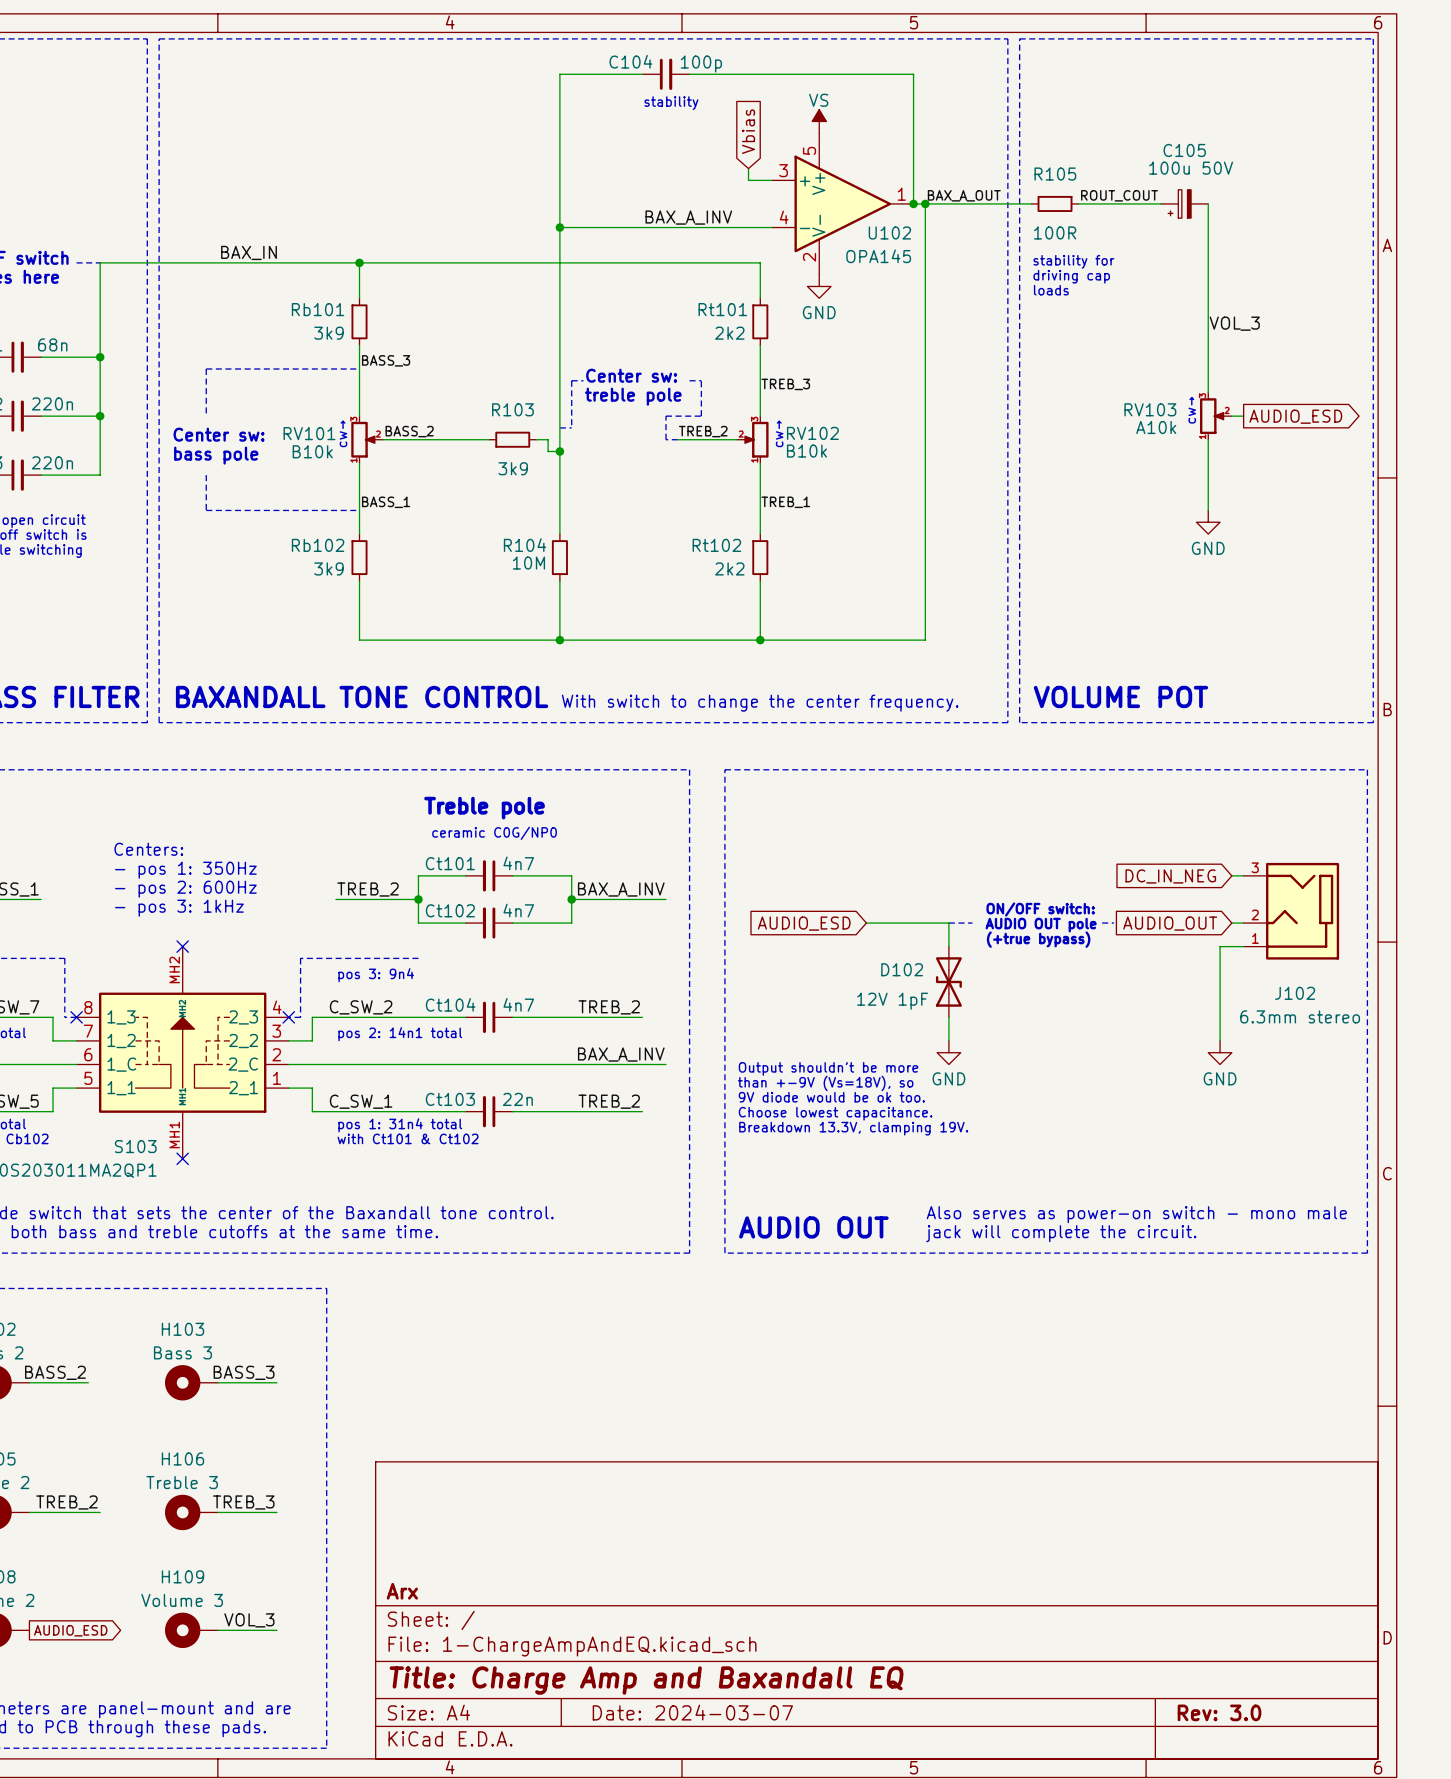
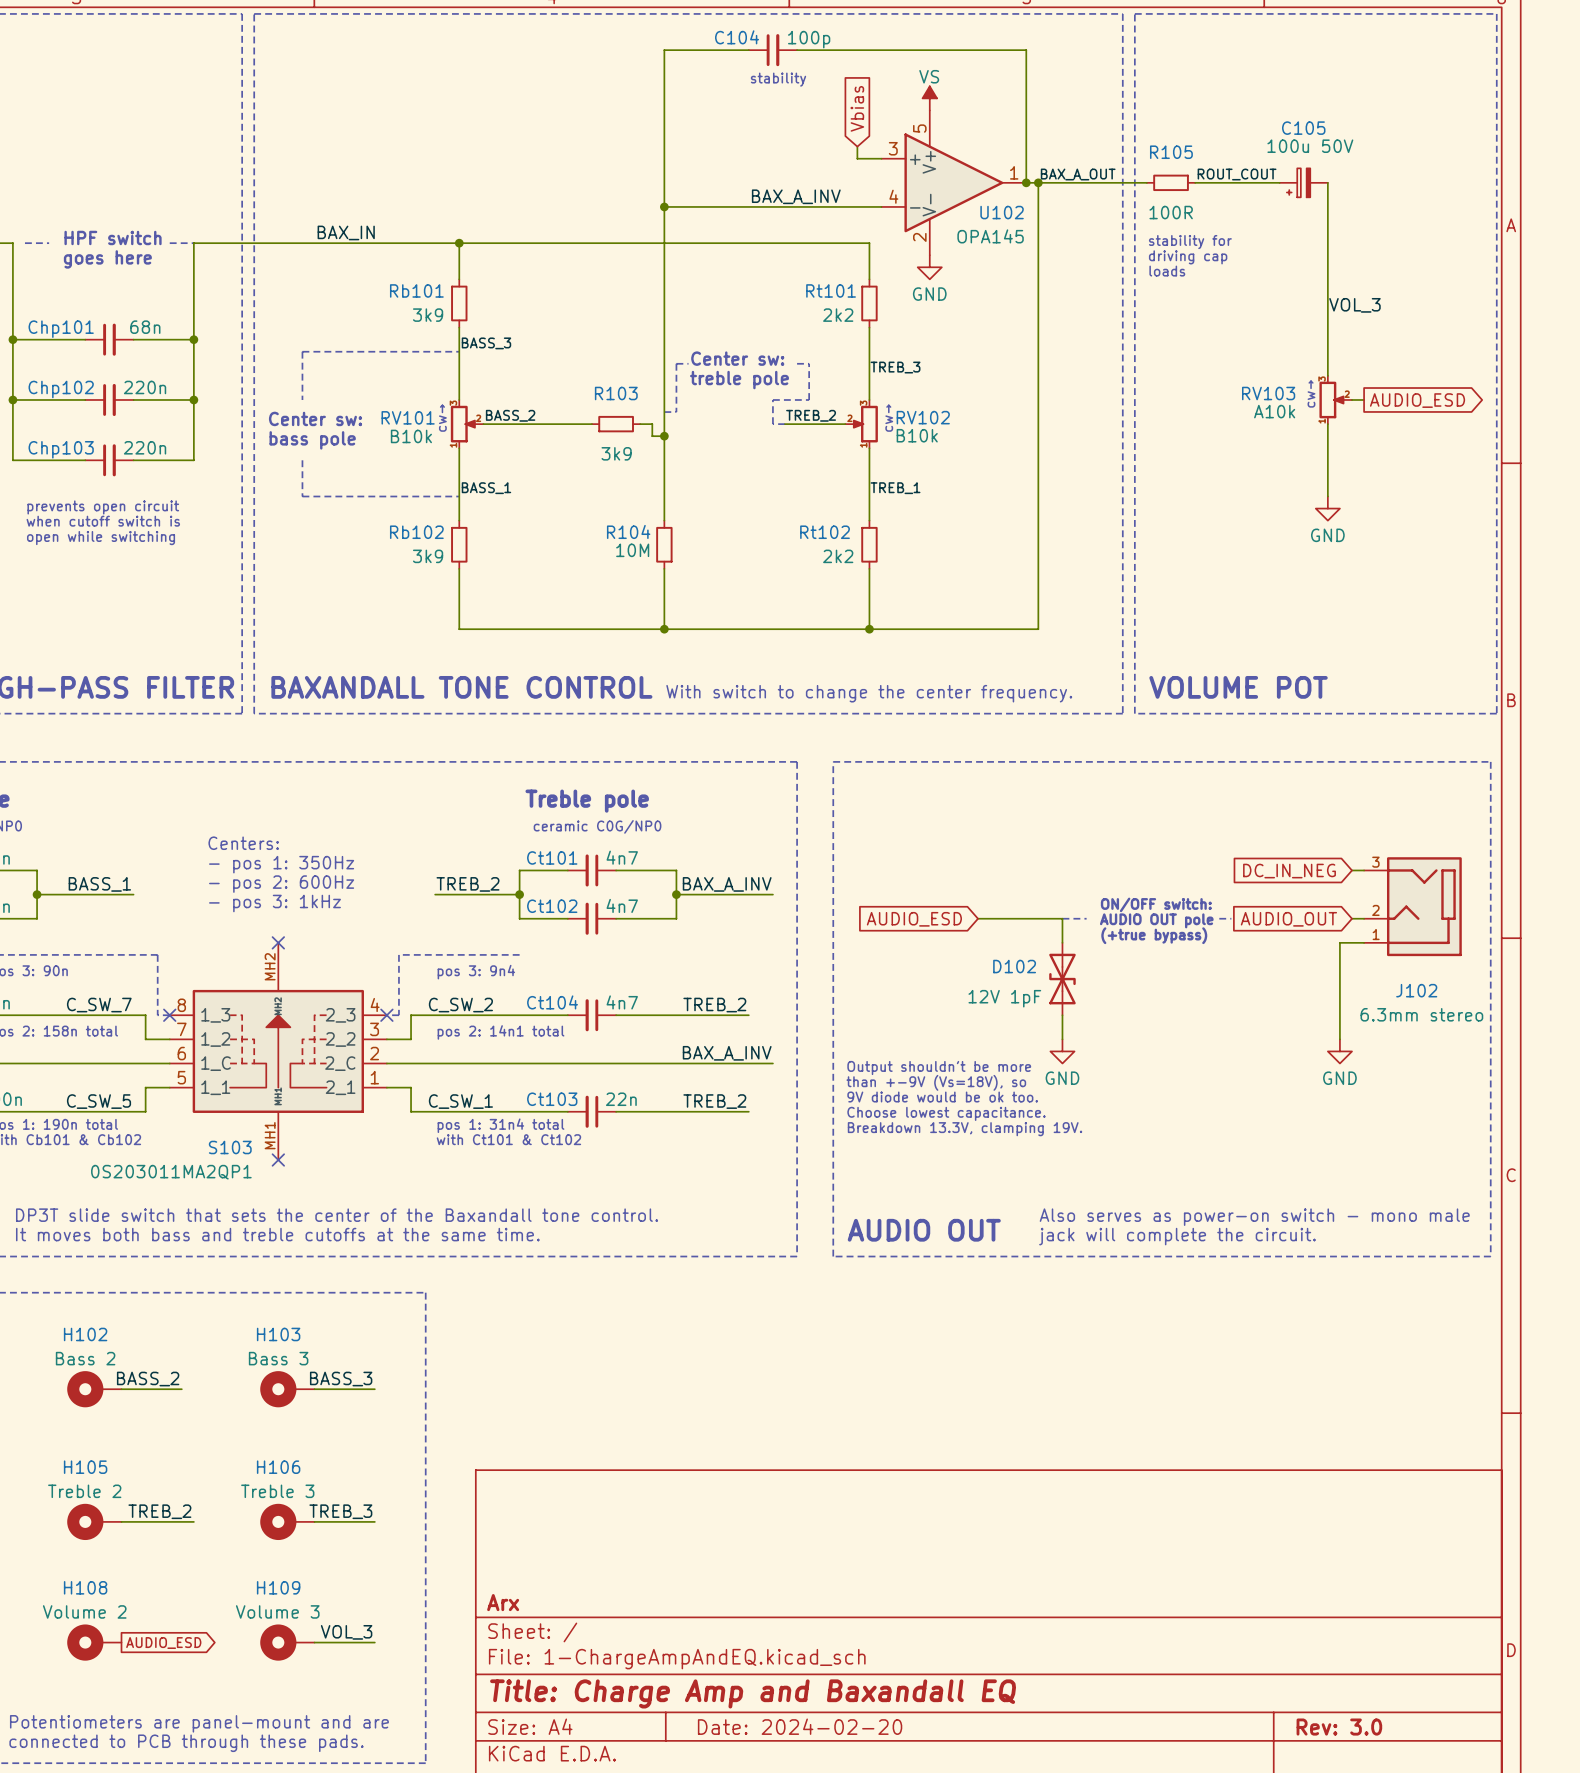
title block: Date: 2024-03-07 (692, 1712) -> Date: 2024-02-20 (800, 1726)

